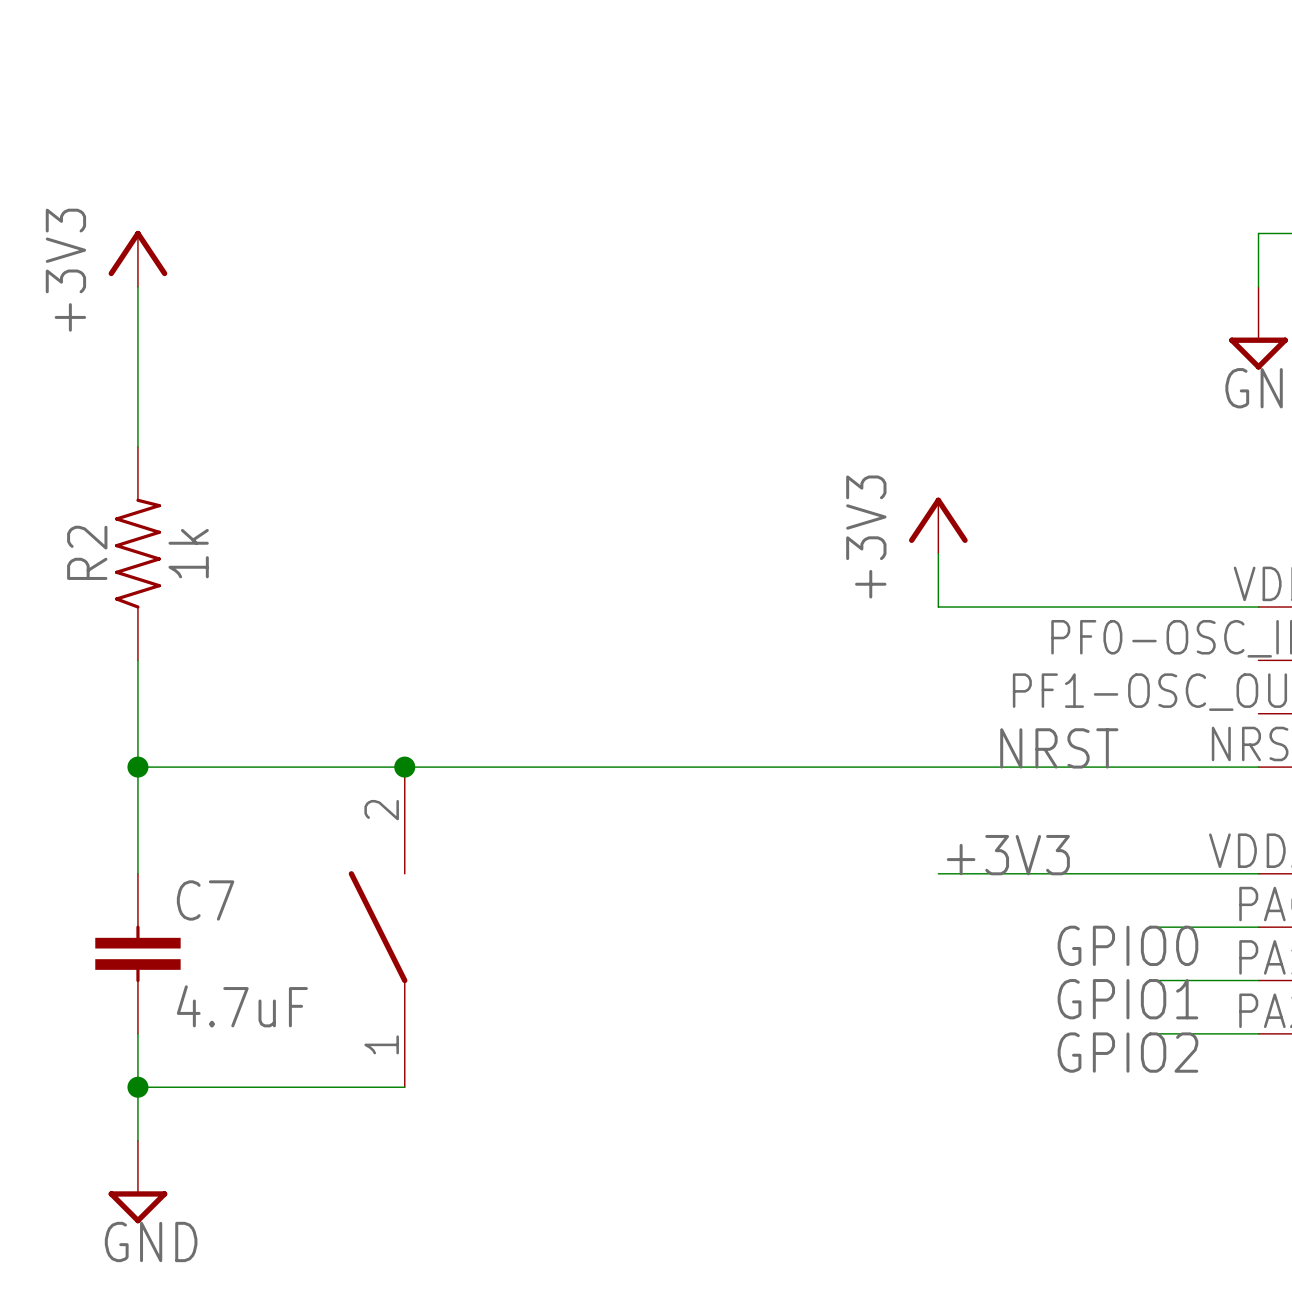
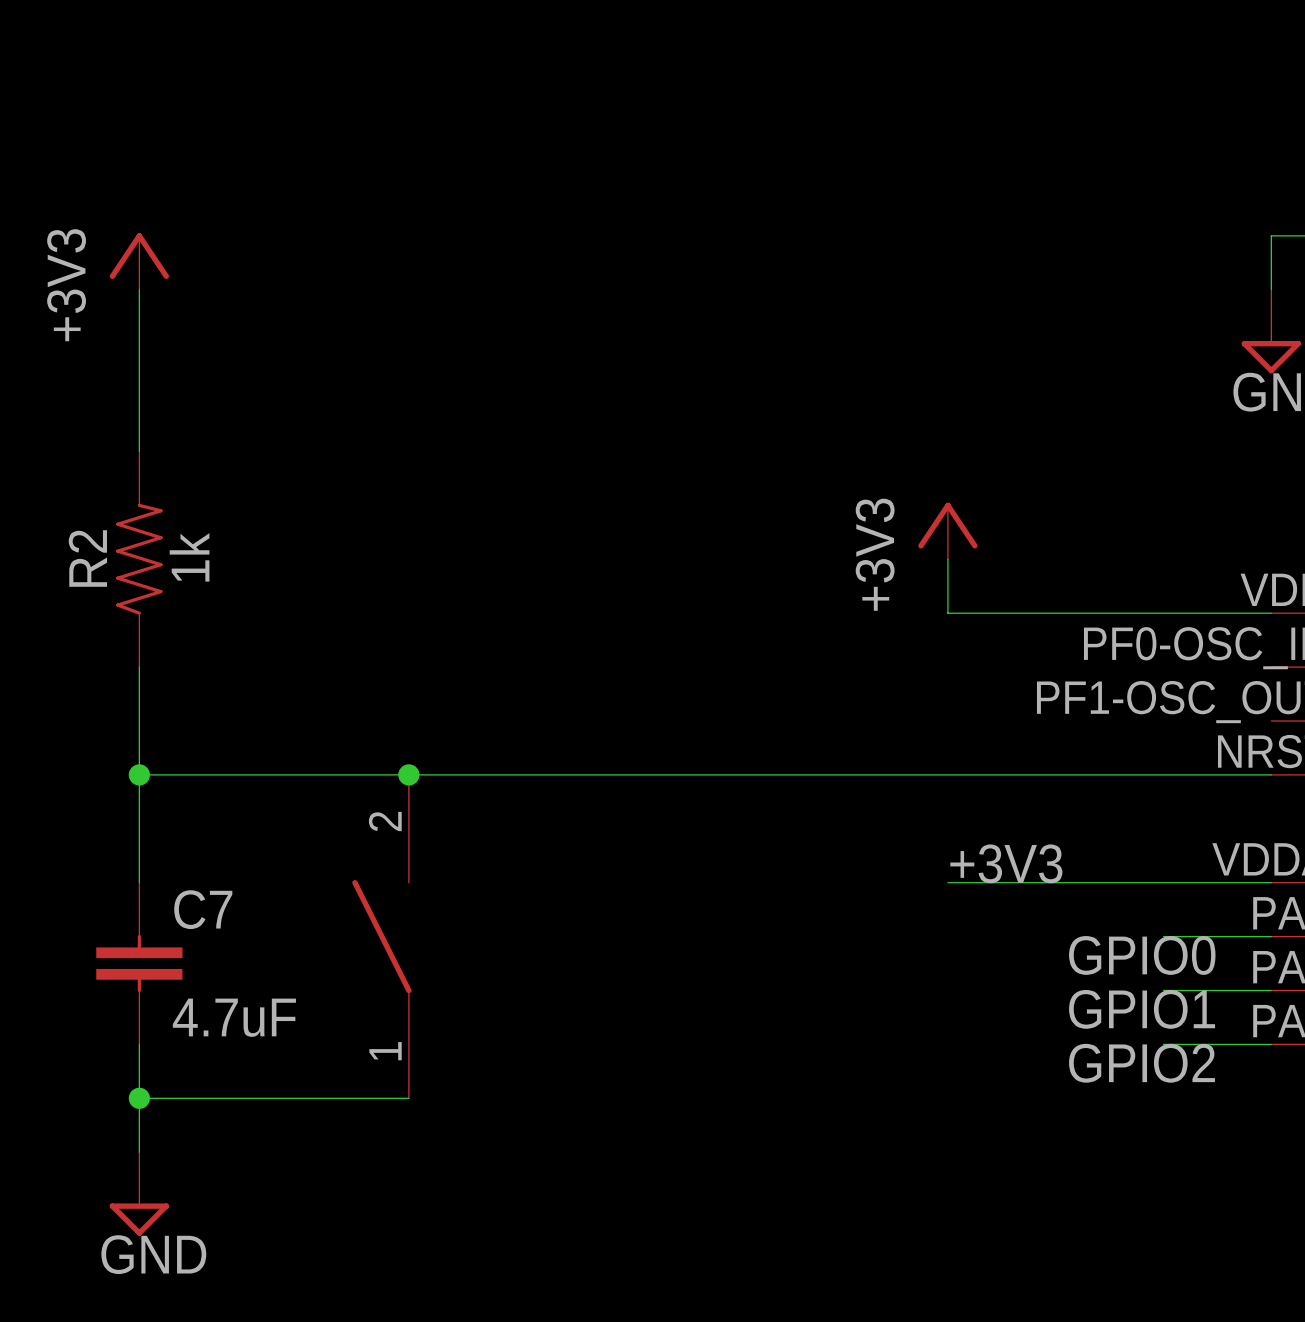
label: NRST (1059, 748) -> none

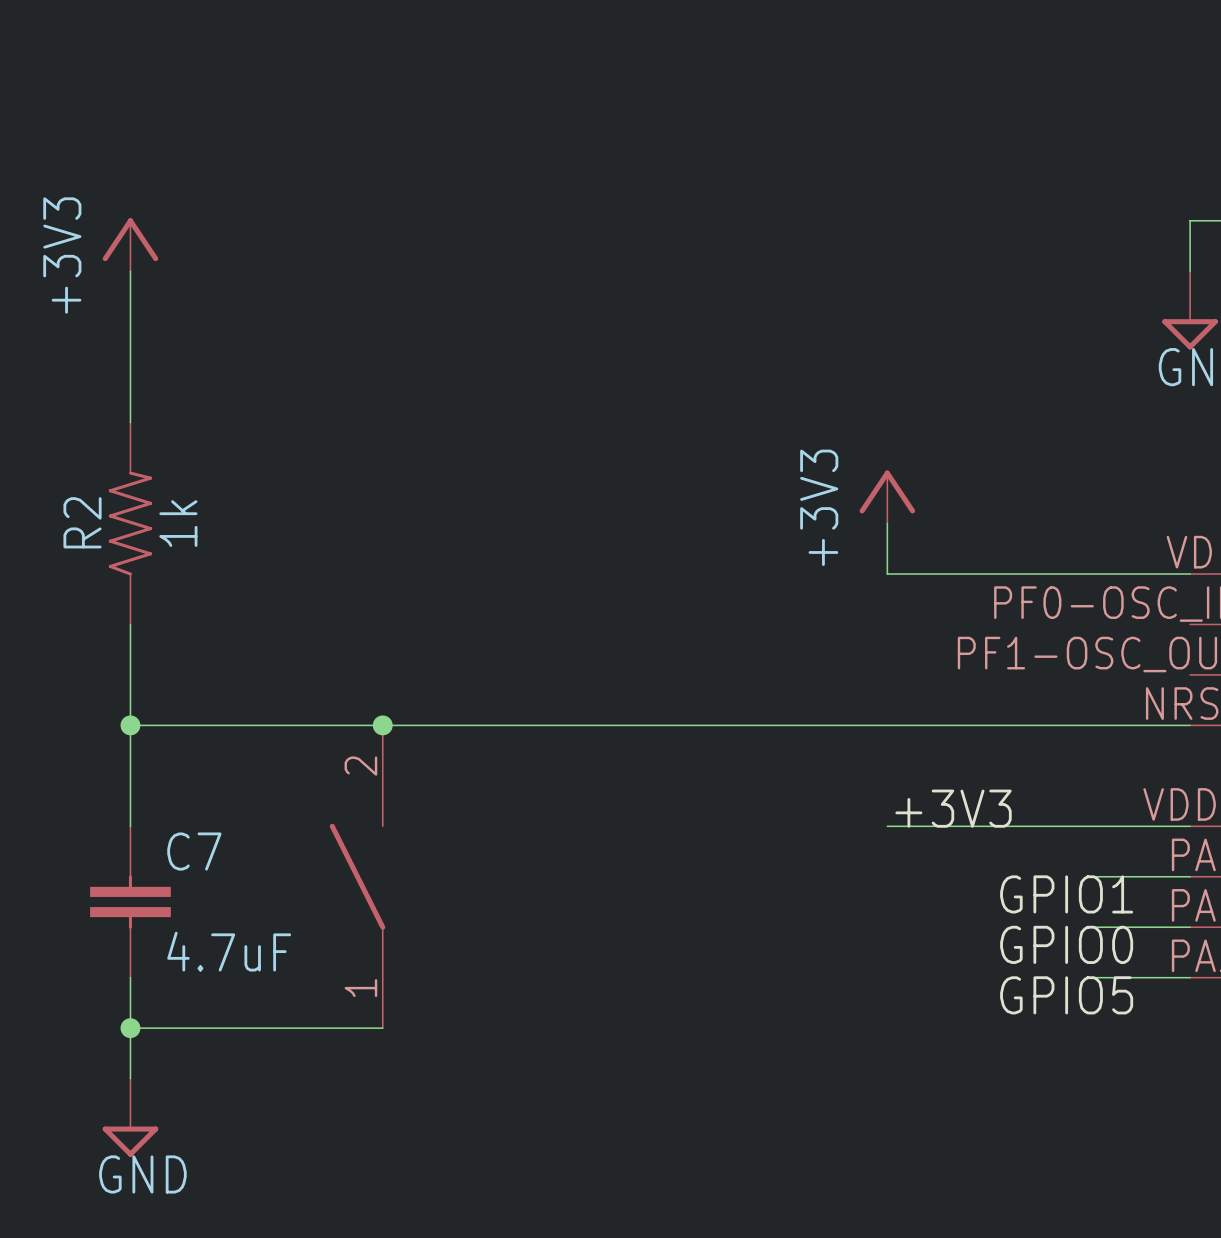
label: GPIO0 (1142, 955) -> GPIO1 (1066, 894)
label: GPIO1 (1142, 1009) -> GPIO0 (1066, 944)
label: GPIO2 (1142, 1063) -> GPIO5 (1066, 995)

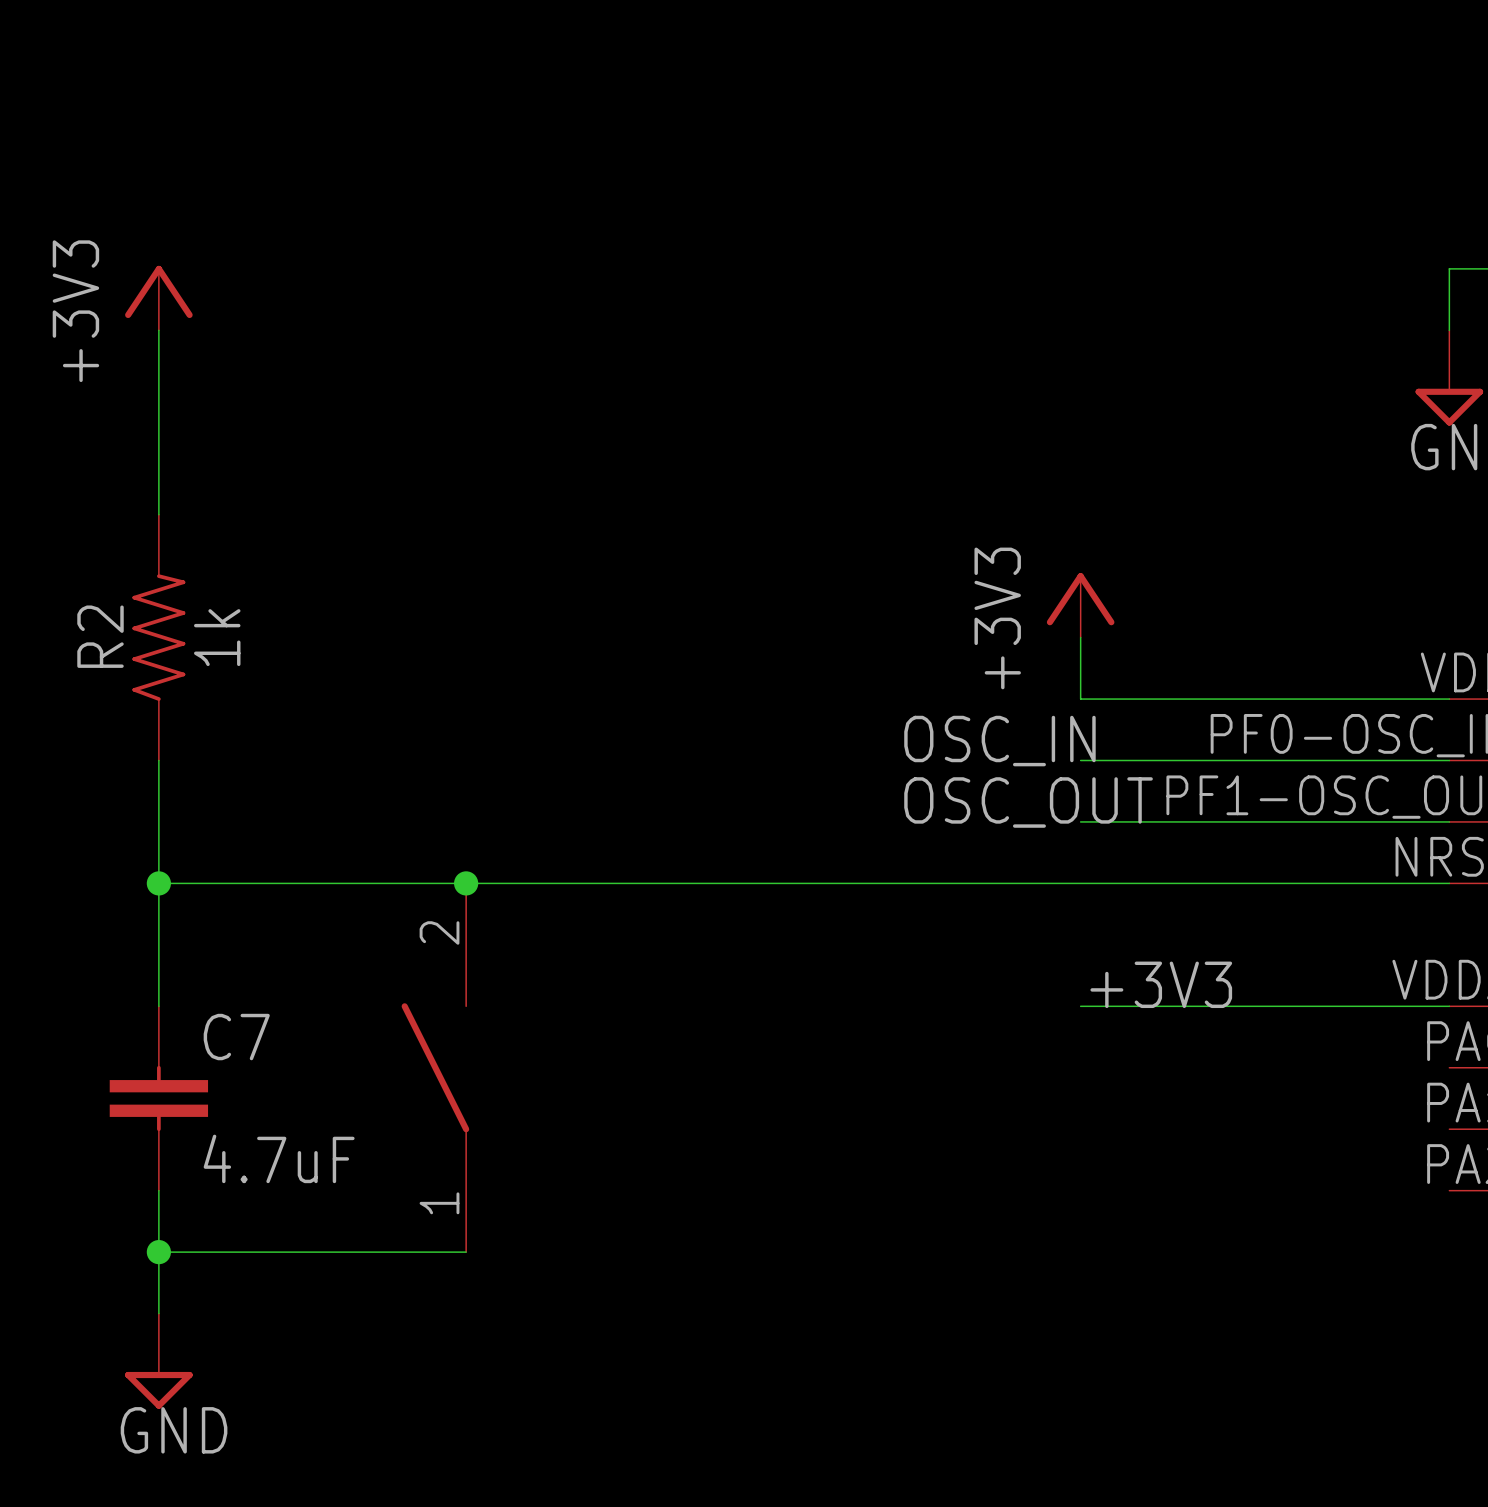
label: none -> OSC_IN (999, 741)
wire: none -> (1080, 760) (1449, 760)
label: none -> OSC_OUT (1028, 802)
wire: none -> (1080, 821) (1449, 821)
wire: (1089, 876) (1190, 876) -> none
label: GPIO1 (1066, 894) -> none
wire: (1089, 927) (1190, 927) -> none
label: GPIO0 (1066, 944) -> none
wire: (1089, 977) (1190, 977) -> none
label: GPIO5 (1066, 995) -> none

